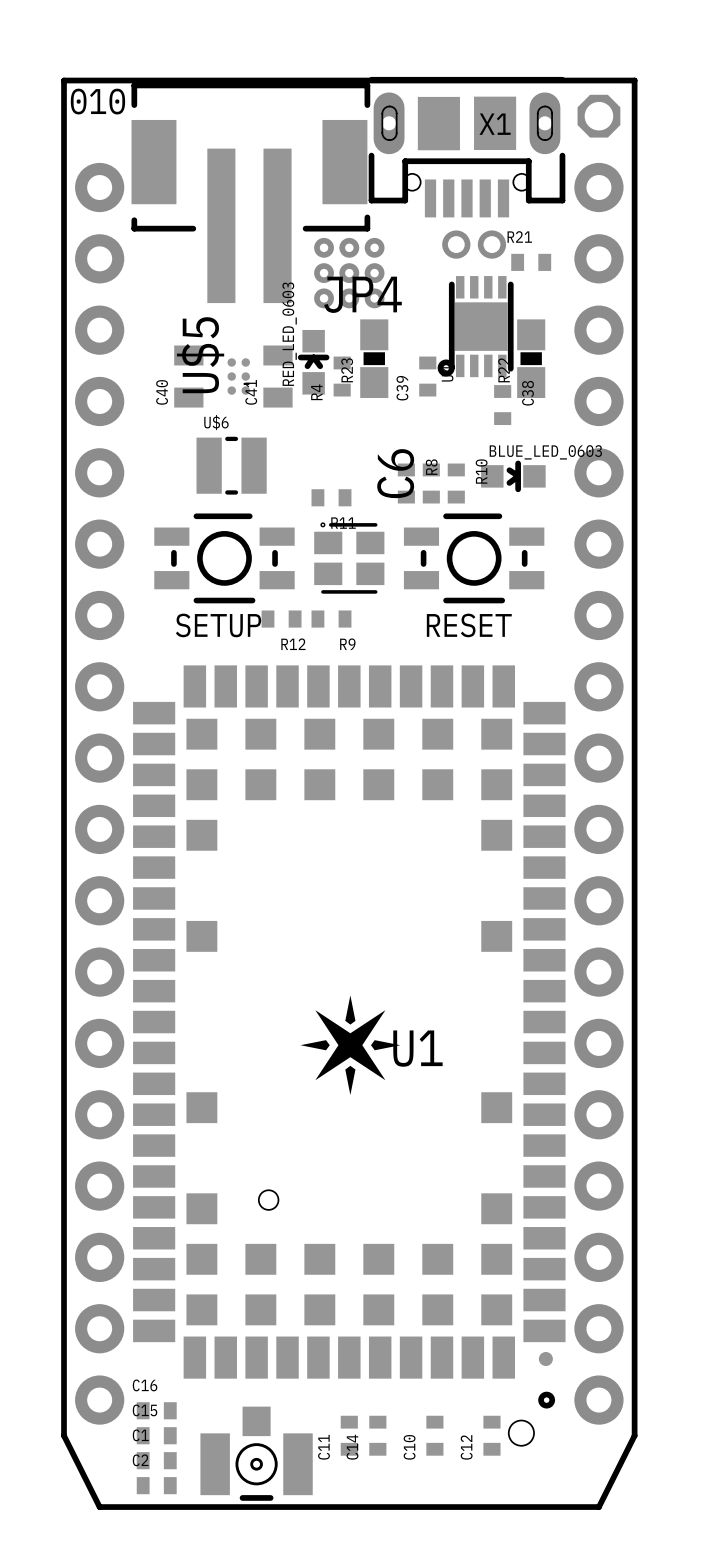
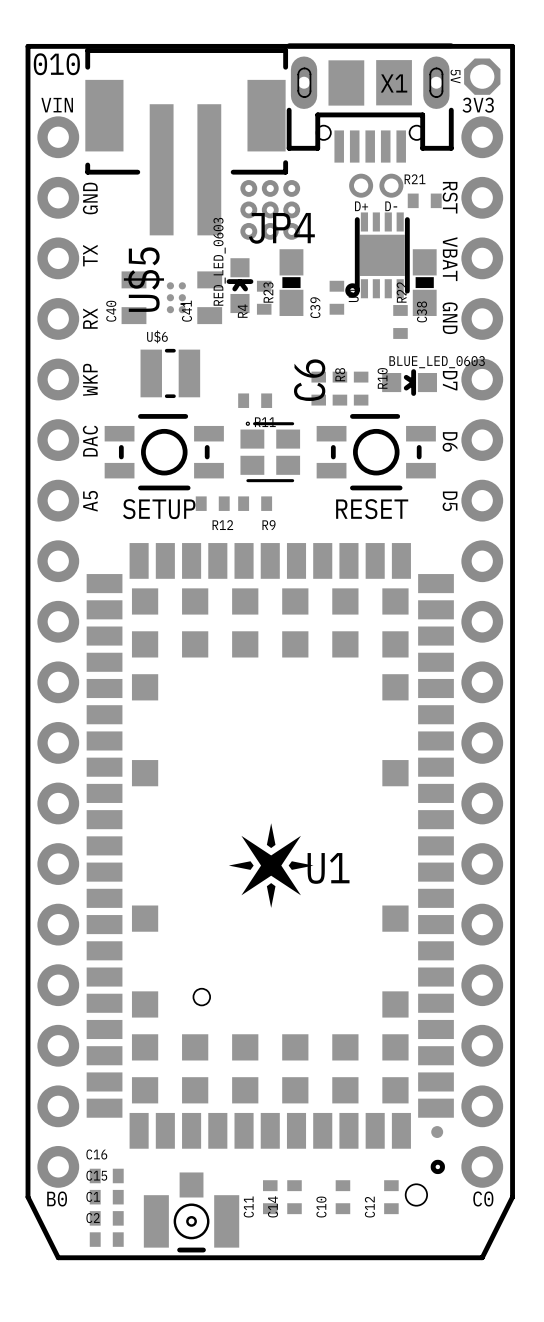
text: none -> 5V (455, 76)
text: none -> VIN (57, 105)
text: none -> 3V3 (478, 105)
text: none -> RST (450, 197)
text: none -> GND (90, 198)
text: none -> D+ (361, 206)
text: none -> D- (391, 206)
text: none -> TX (90, 255)
text: none -> VBAT (450, 259)
text: none -> GND (450, 318)
text: none -> RX (90, 318)
text: none -> WKP (90, 379)
text: none -> D7 (450, 380)
text: none -> DAC (90, 441)
text: none -> D6 (450, 441)
text: none -> A5 (90, 501)
text: none -> D5 (450, 501)
text: none -> B0 (57, 1198)
text: none -> C0 (483, 1198)

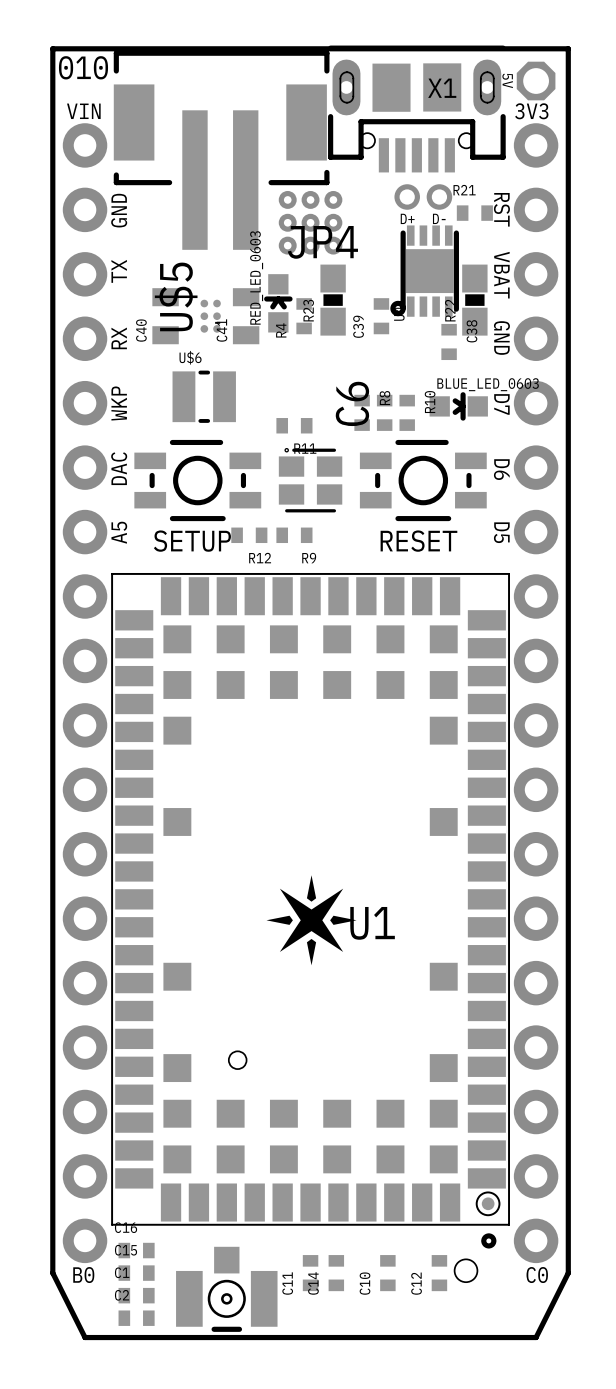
line: none -> (112, 573) (509, 573) (509, 1224) (112, 1224) (112, 573)
drawing: none -> [475, 1191, 501, 1217]

